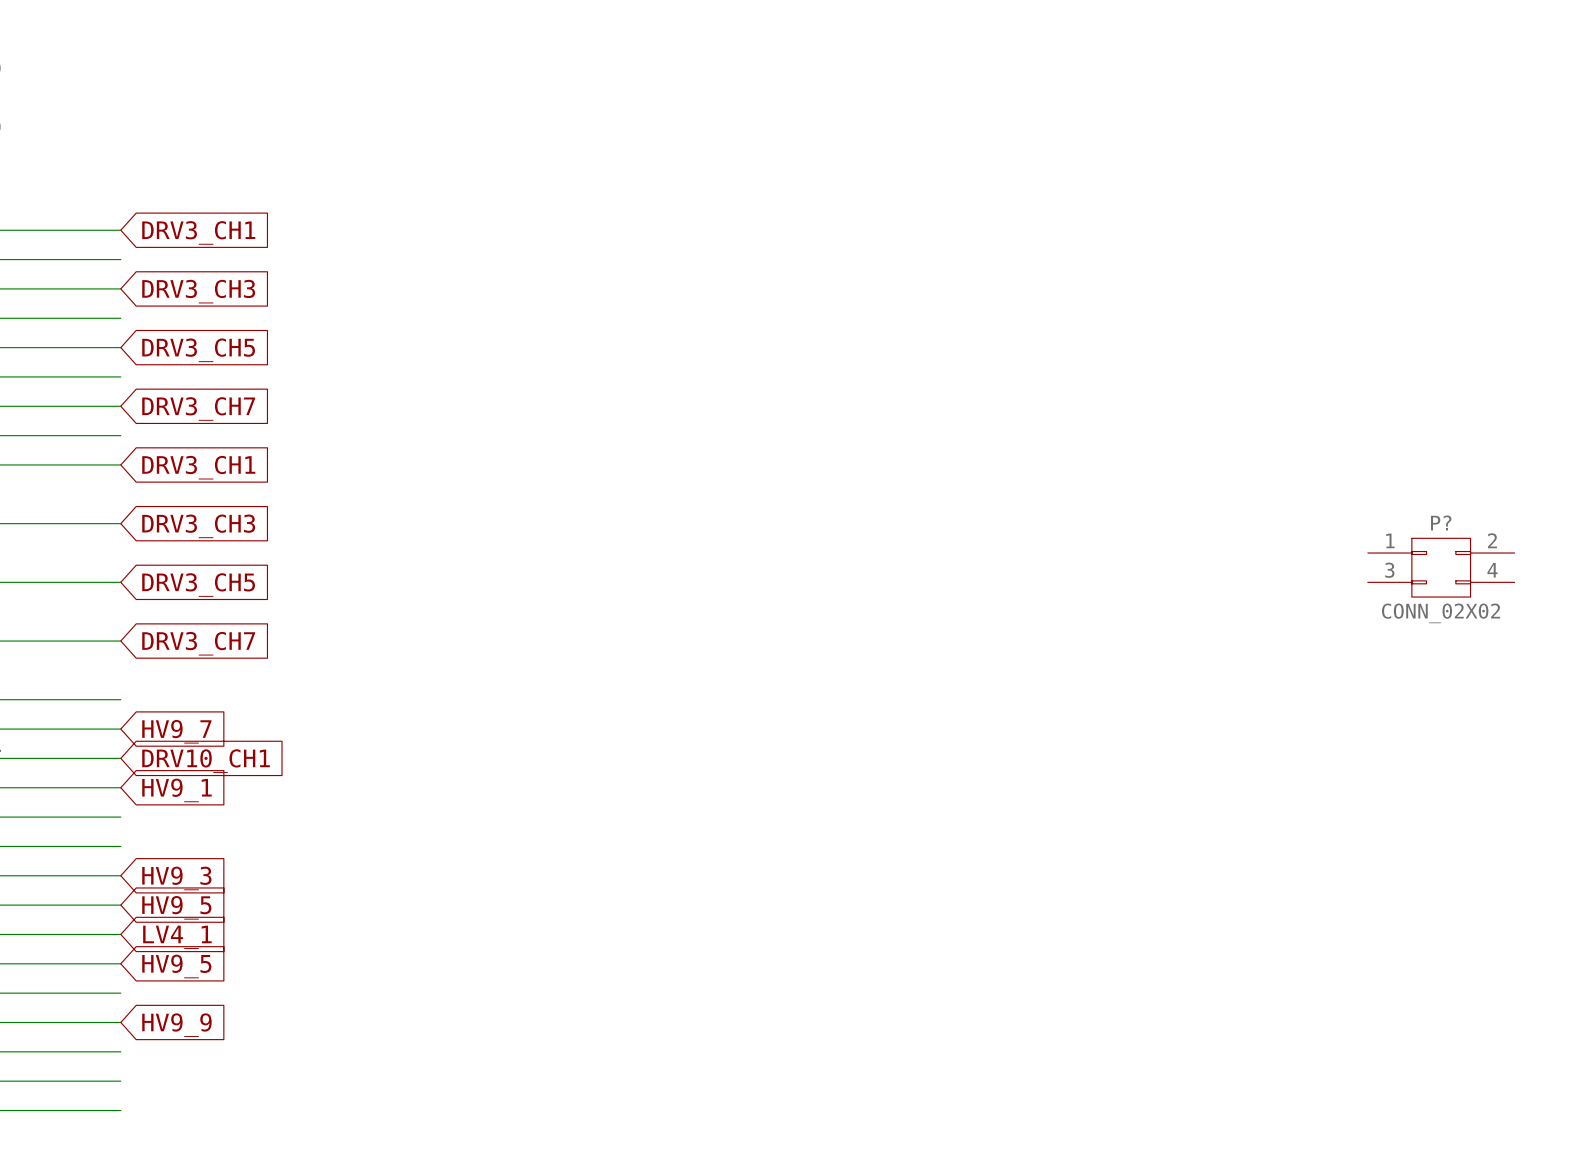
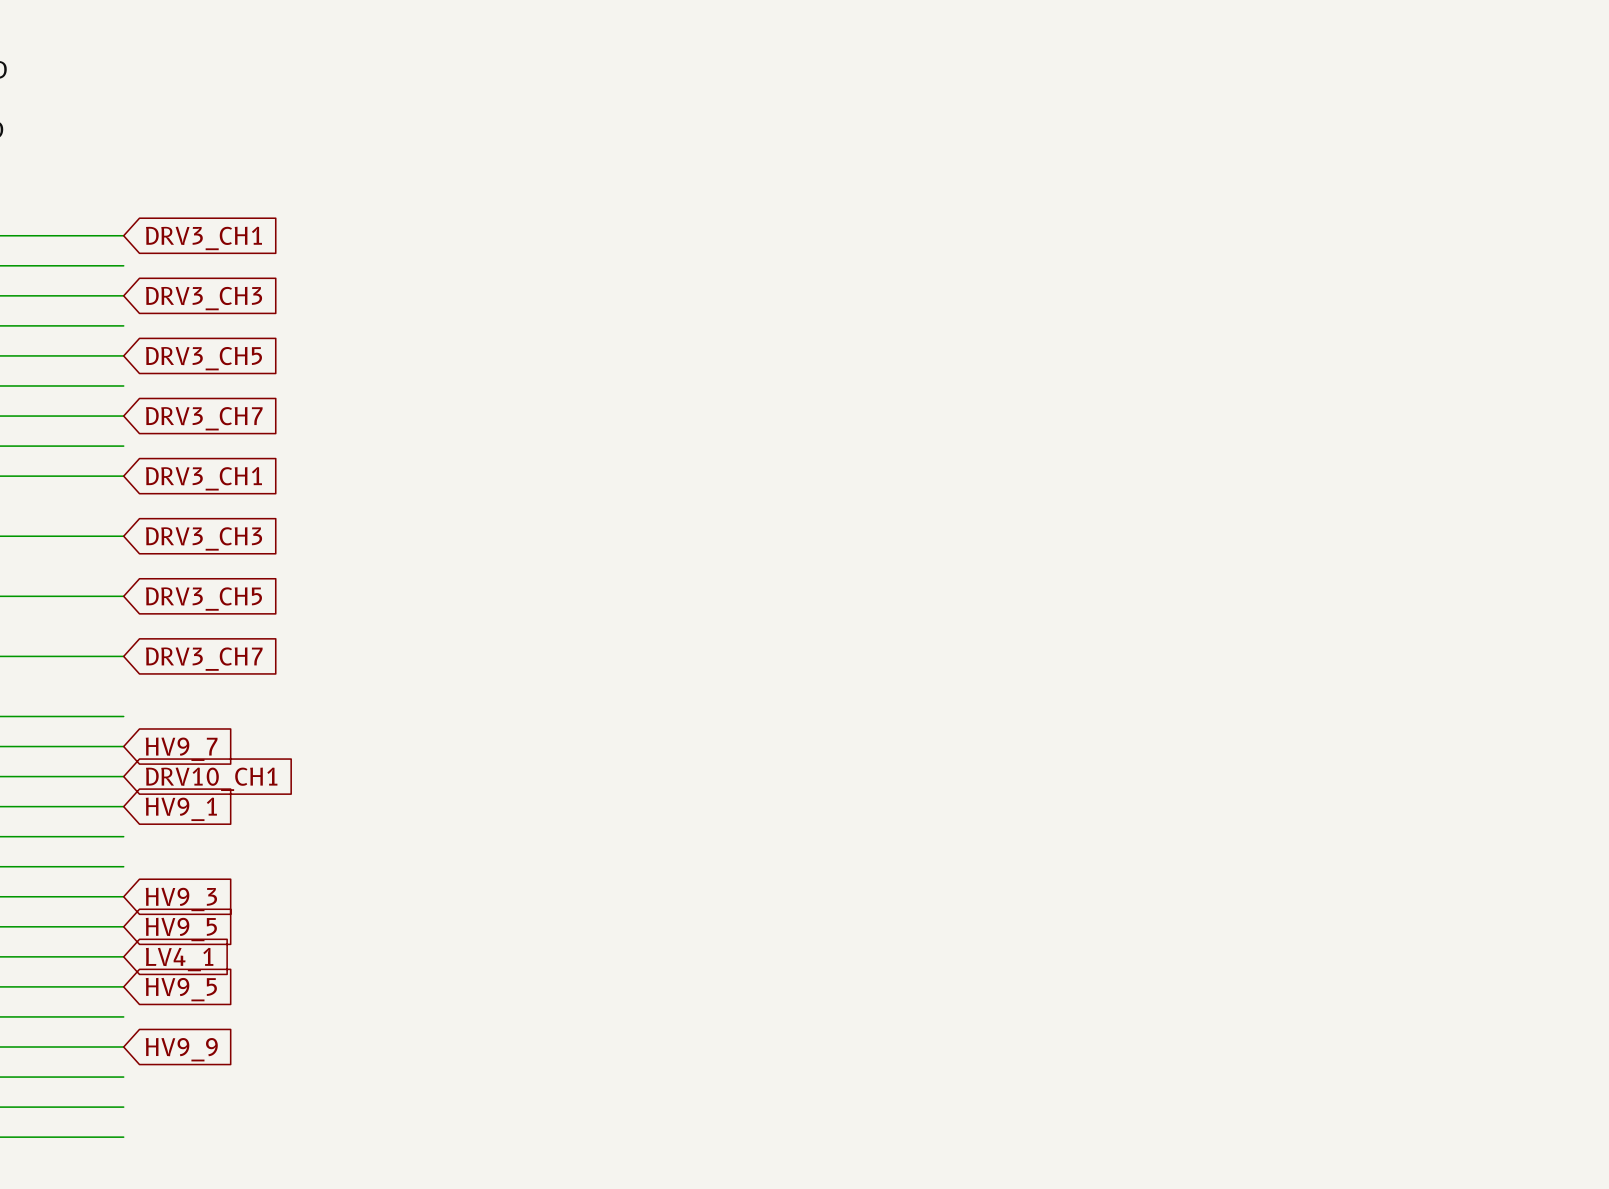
P?: CONN_02X02 (1441, 567) -> none

